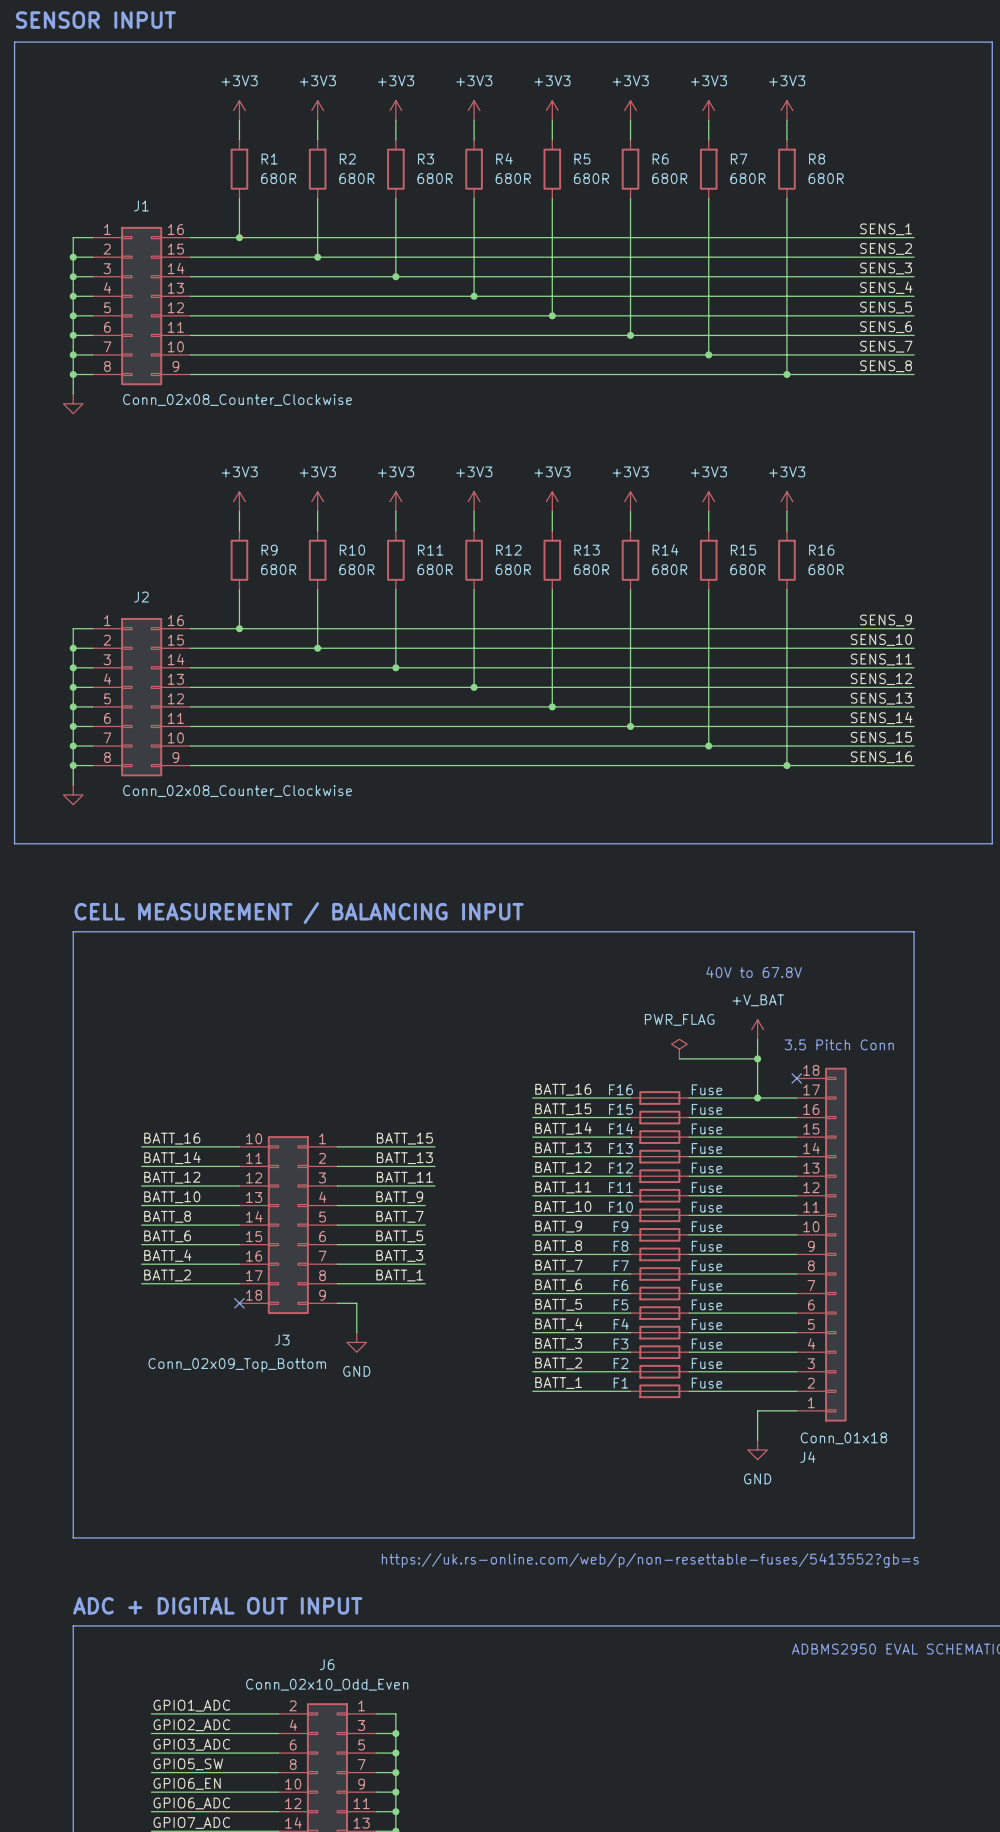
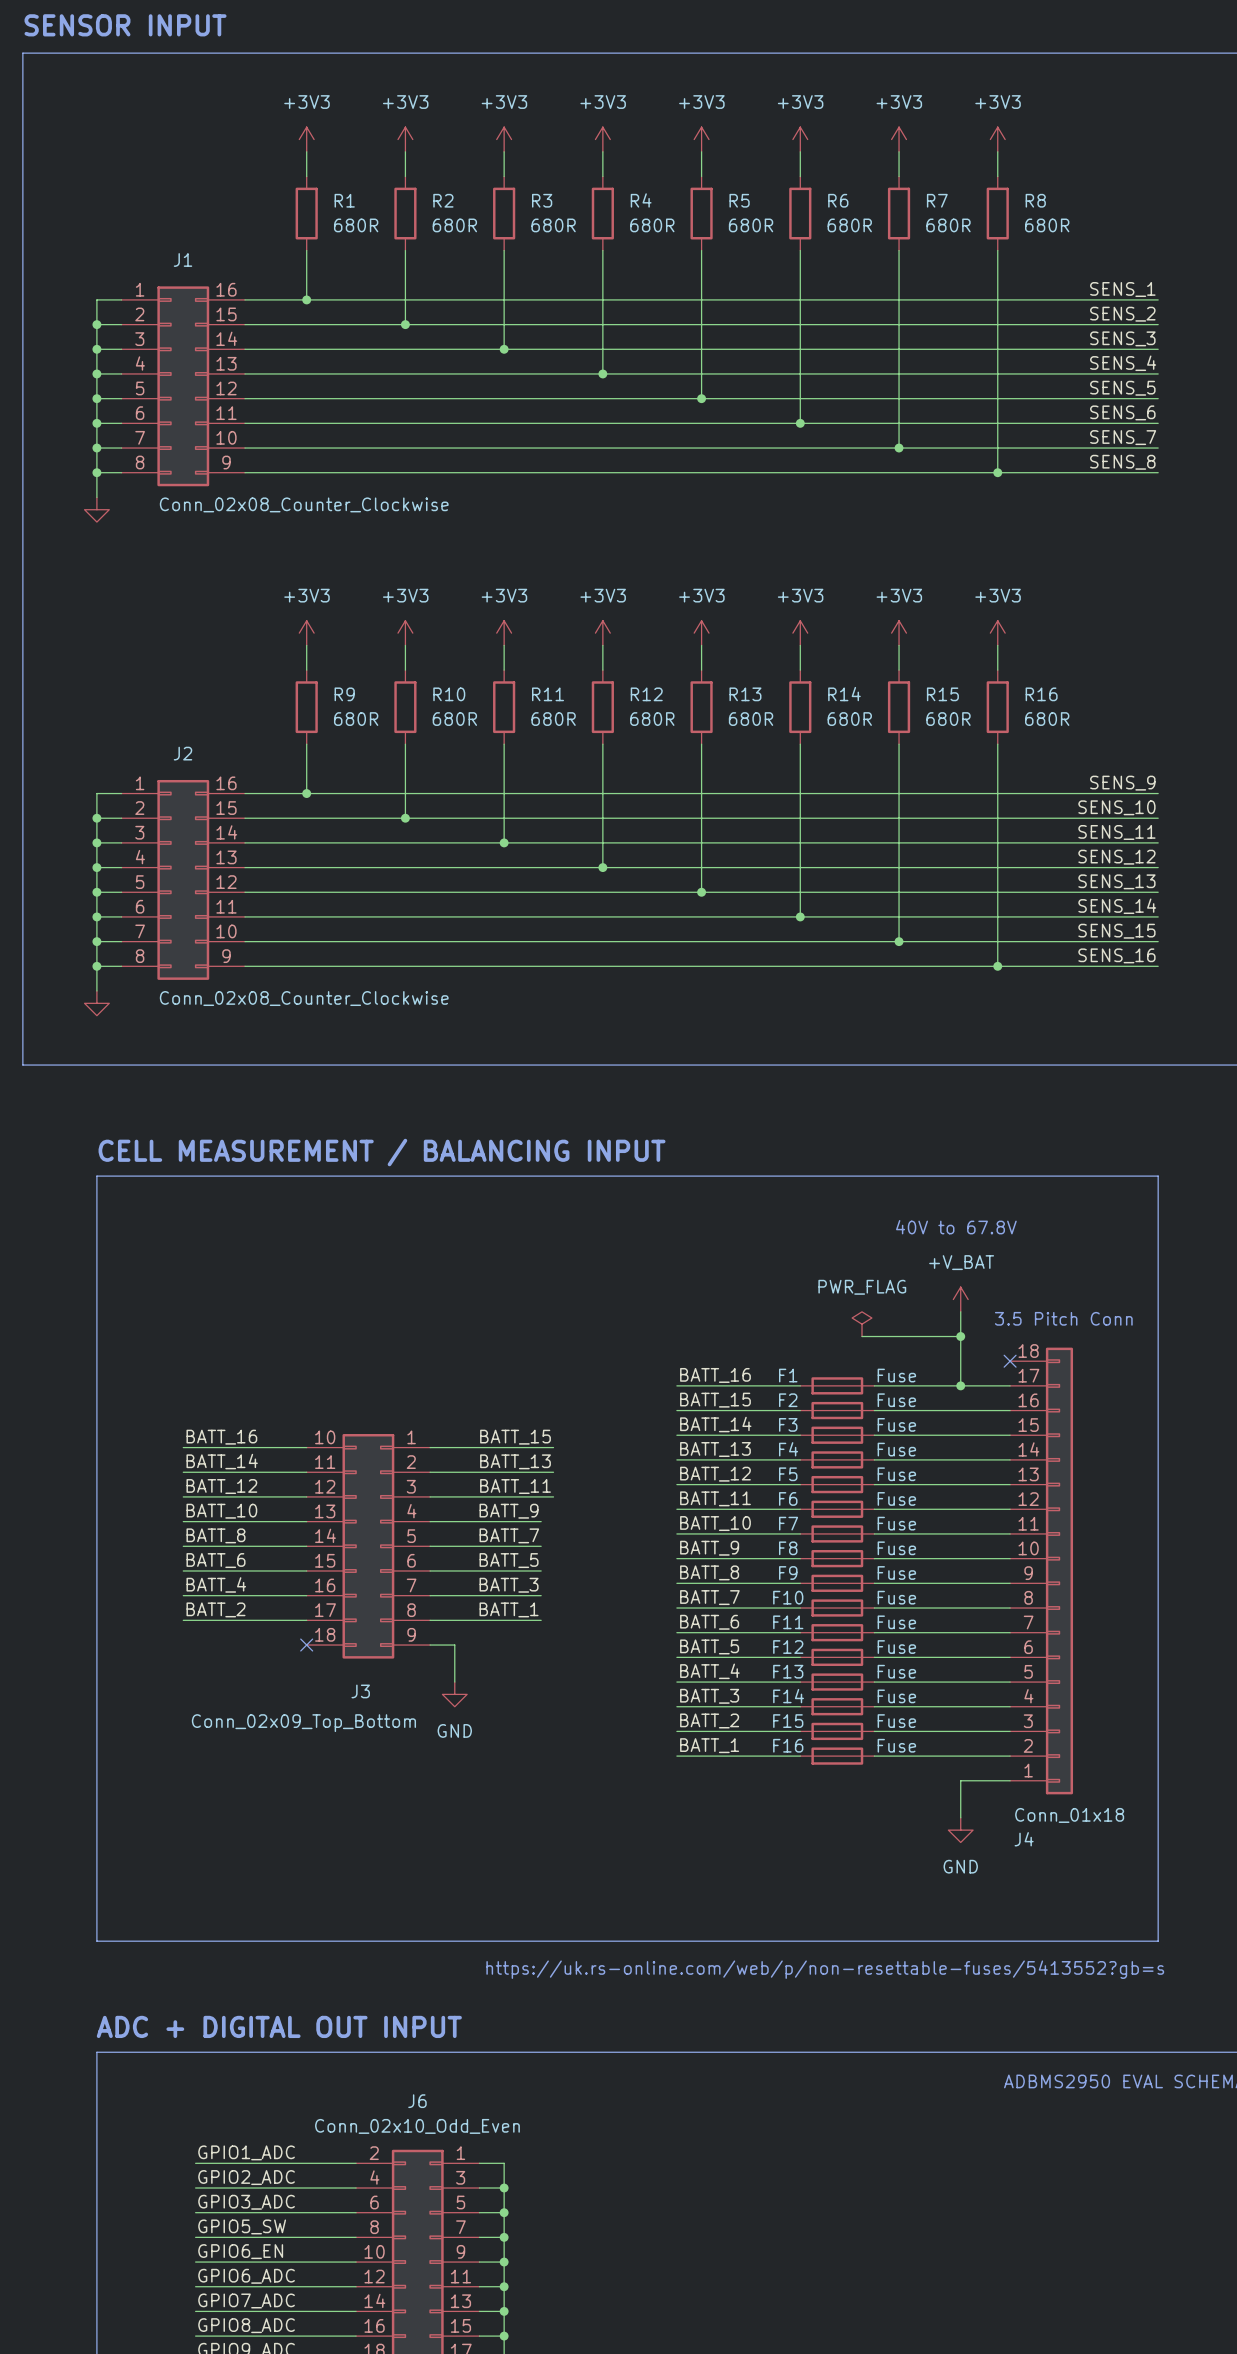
F16 name: F16 (620, 1089) -> F1 (788, 1375)
F15 name: F15 (620, 1109) -> F2 (788, 1400)
F14 name: F14 (621, 1128) -> F3 (788, 1424)
F13 name: F13 (620, 1148) -> F4 (788, 1449)
F12 name: F12 (620, 1168) -> F5 (788, 1474)
F11 name: F11 (620, 1187) -> F6 (788, 1498)
F10 name: F10 (620, 1207) -> F7 (788, 1523)
F9 name: F9 (620, 1226) -> F8 (788, 1548)
F8 name: F8 (620, 1246) -> F9 (788, 1572)
F7 name: F7 (621, 1265) -> F10 (788, 1597)
F6 name: F6 (620, 1285) -> F11 (788, 1622)
F5 name: F5 (620, 1304) -> F12 (788, 1647)
F4 name: F4 (621, 1324) -> F13 (788, 1671)
F3 name: F3 (620, 1344) -> F14 (788, 1696)
F2 name: F2 (620, 1363) -> F15 (788, 1721)
F1 name: F1 (620, 1383) -> F16 (788, 1745)

